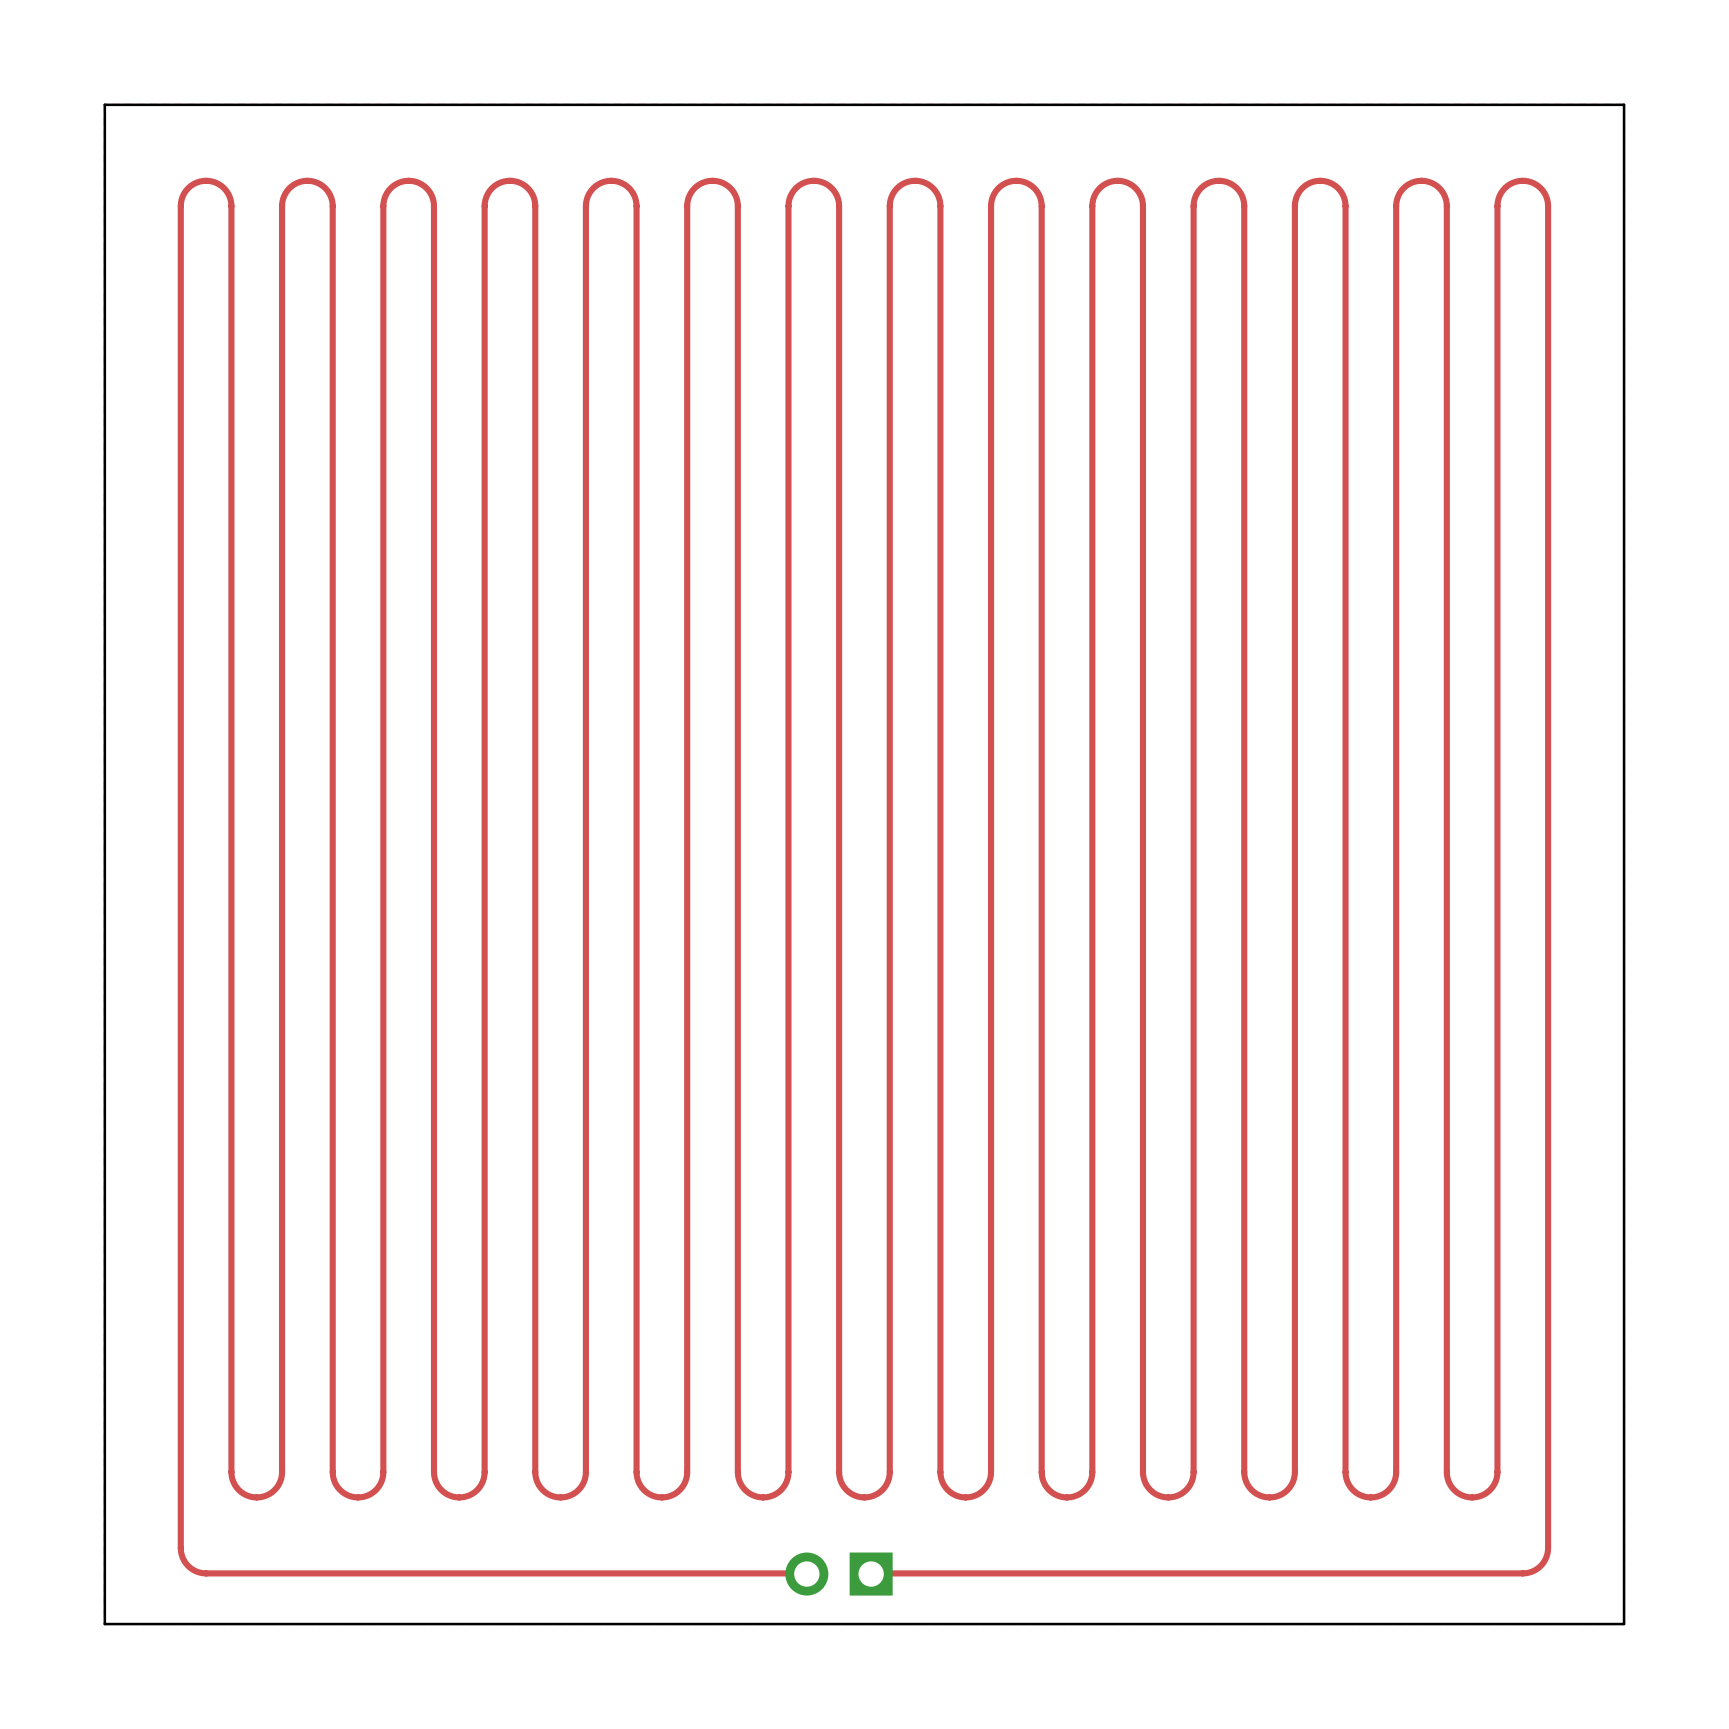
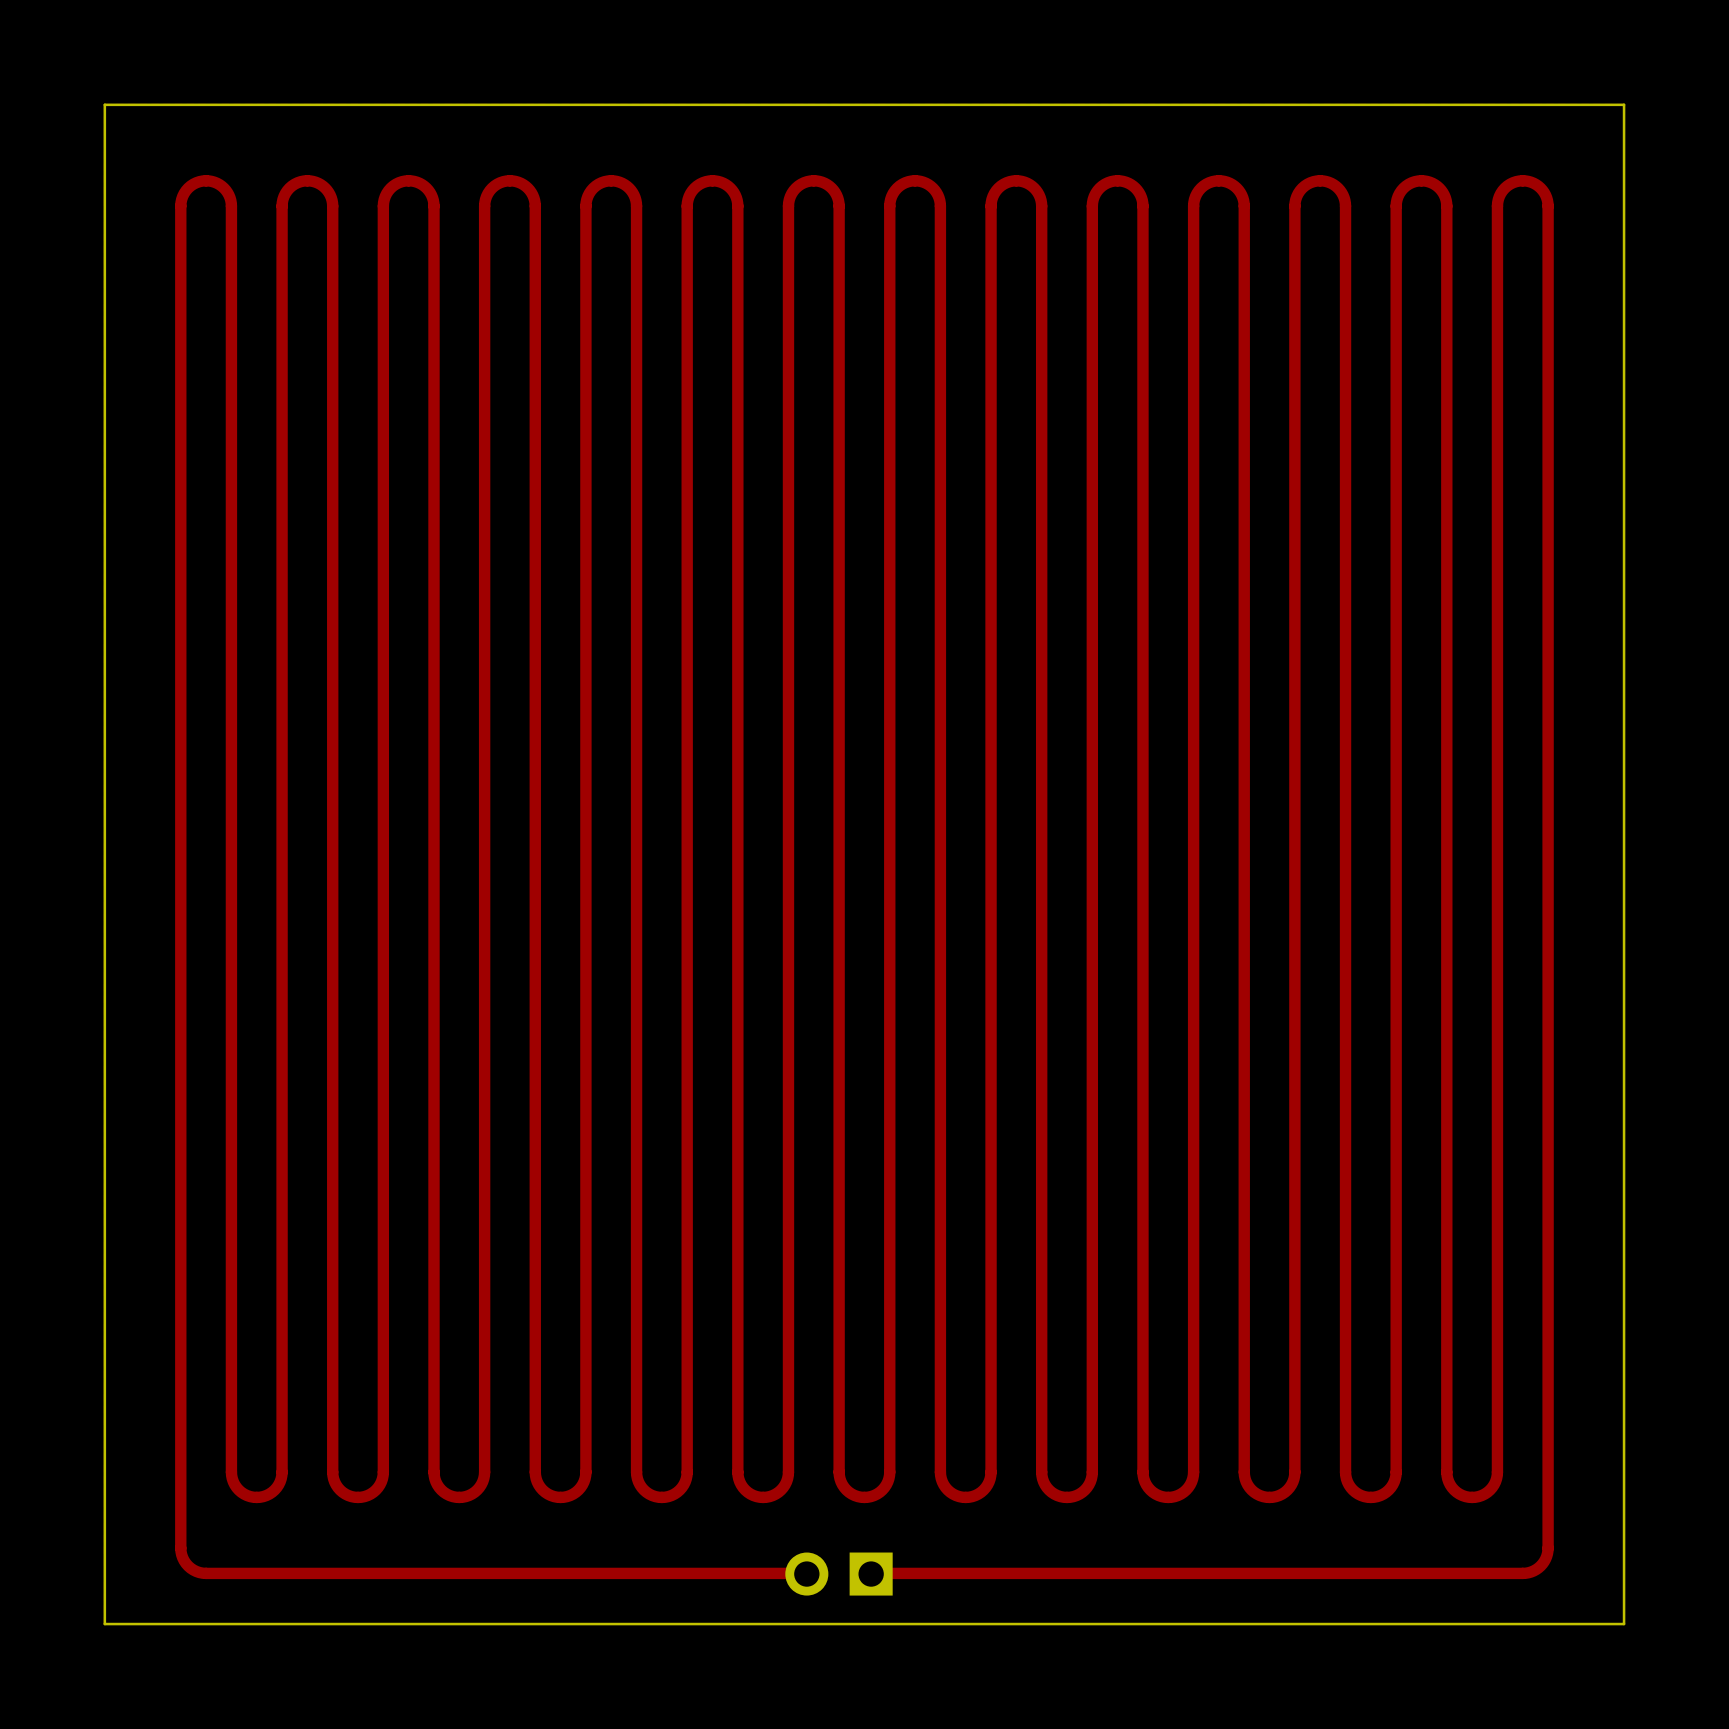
top track width: thin (806, 1573) (206, 1573) (193, 1570) (182, 1557) (180, 1548) (180, 206) (184, 193) (196, 182) (211, 181) (225, 190) (231, 206) (231, 1472) (233, 1481) (238, 1490) (247, 1495) (256, 1497) (266, 1495) (274, 1490) (280, 1481) (282, 1472) (282, 206) (283, 196) (294, 184) (310, 180) (325, 188) (332, 203) (332, 1472) (334, 1481) (340, 1490) (348, 1495) (358, 1497) (367, 1495) (375, 1490) (381, 1481) (383, 1472) (384, 199) (393, 186) (402, 181) (411, 180) (426, 188) (433, 203) (433, 1472) (435, 1481) (441, 1490) (449, 1495) (459, 1497) (469, 1495) (477, 1490) (482, 1481) (484, 1472) (484, 202) (488, 193) (494, 186) (509, 180) (525, 186) (531, 192) (535, 203) (535, 1472) (537, 1481) (542, 1490) (550, 1495) (560, 1497) (570, 1495) (578, 1490) (583, 1481) (585, 1472) (585, 206) (587, 196) (593, 188) (607, 181) (624, 184) (632, 192) (635, 200) (636, 1472) (638, 1481) (643, 1490) (652, 1495) (661, 1497) (671, 1495) (679, 1490) (685, 1481) (687, 1472) (687, 206) (692, 190) (699, 184) (709, 181) (725, 184) (736, 197) (737, 1472) (739, 1481) (745, 1490) (753, 1495) (763, 1497) (772, 1495) (781, 1490) (786, 1481) (788, 1472) (788, 206) (793, 190) (807, 181) (816, 180) (824, 183) (836, 195) (839, 206) (839, 1472) (841, 1481) (846, 1490) (854, 1495) (864, 1497) (874, 1495) (882, 1490) (887, 1481) (889, 1472) (889, 206) (894, 190) (908, 181) (923, 182) (936, 192) (940, 206) (940, 1472) (942, 1481) (947, 1490) (956, 1495) (965, 1497) (975, 1495) (983, 1490) (989, 1481) (991, 1472) (991, 206) (996, 190) (1009, 181) (1024, 182) (1037, 192) (1041, 206) (1041, 1472) (1043, 1481) (1049, 1490) (1057, 1495) (1067, 1497) (1076, 1495) (1084, 1490) (1090, 1481) (1092, 1472) (1092, 206) (1097, 190) (1107, 182) (1123, 181) (1137, 190) (1142, 206) (1142, 1472) (1144, 1481) (1150, 1490) (1158, 1495) (1168, 1497) (1177, 1495) (1186, 1490) (1191, 1481) (1193, 1472) (1193, 206) (1198, 190) (1209, 182) (1224, 181) (1238, 190) (1244, 206) (1244, 1472) (1246, 1481) (1251, 1490) (1259, 1495) (1269, 1497) (1279, 1495) (1287, 1490) (1292, 1481) (1294, 1472) (1294, 206) (1300, 190) (1310, 182) (1325, 181) (1338, 188) (1344, 197) (1345, 206) (1345, 1472) (1347, 1481) (1352, 1490) (1361, 1495) (1370, 1497) (1380, 1495) (1388, 1490) (1394, 1481) (1396, 1472) (1396, 206) (1399, 193) (1411, 182) (1427, 181) (1439, 188) (1445, 197) (1446, 206) (1446, 1472) (1448, 1481) (1454, 1490) (1462, 1495) (1472, 1497) (1481, 1495) (1490, 1490) (1495, 1481) (1497, 1472) (1497, 206) (1500, 193) (1510, 184) (1522, 180) (1533, 183) (1544, 192) (1548, 206) (1548, 1548) (1545, 1559) (1536, 1569) (1522, 1573) (871, 1574) -> thick (806, 1573) (206, 1573) (193, 1570) (182, 1557) (180, 1548) (180, 206) (184, 193) (196, 182) (211, 181) (225, 190) (231, 206) (231, 1472) (233, 1481) (238, 1490) (247, 1495) (256, 1497) (266, 1495) (274, 1490) (280, 1481) (282, 1472) (282, 206) (283, 196) (294, 184) (310, 180) (325, 188) (332, 203) (332, 1472) (334, 1481) (340, 1490) (348, 1495) (358, 1497) (367, 1495) (375, 1490) (381, 1481) (383, 1472) (384, 199) (393, 186) (402, 181) (411, 180) (426, 188) (433, 203) (433, 1472) (435, 1481) (441, 1490) (449, 1495) (459, 1497) (469, 1495) (477, 1490) (482, 1481) (484, 1472) (484, 202) (488, 193) (494, 186) (509, 180) (525, 186) (531, 192) (535, 203) (535, 1472) (537, 1481) (542, 1490) (550, 1495) (560, 1497) (570, 1495) (578, 1490) (583, 1481) (585, 1472) (585, 206) (587, 196) (593, 188) (607, 181) (624, 184) (632, 192) (635, 200) (636, 1472) (638, 1481) (643, 1490) (652, 1495) (661, 1497) (671, 1495) (679, 1490) (685, 1481) (687, 1472) (687, 206) (692, 190) (699, 184) (709, 181) (725, 184) (736, 197) (737, 1472) (739, 1481) (745, 1490) (753, 1495) (763, 1497) (772, 1495) (781, 1490) (786, 1481) (788, 1472) (788, 206) (793, 190) (807, 181) (816, 180) (824, 183) (836, 195) (839, 206) (839, 1472) (841, 1481) (846, 1490) (854, 1495) (864, 1497) (874, 1495) (882, 1490) (887, 1481) (889, 1472) (889, 206) (894, 190) (908, 181) (923, 182) (936, 192) (940, 206) (940, 1472) (942, 1481) (947, 1490) (956, 1495) (965, 1497) (975, 1495) (983, 1490) (989, 1481) (991, 1472) (991, 206) (996, 190) (1009, 181) (1024, 182) (1037, 192) (1041, 206) (1041, 1472) (1043, 1481) (1049, 1490) (1057, 1495) (1067, 1497) (1076, 1495) (1084, 1490) (1090, 1481) (1092, 1472) (1092, 206) (1097, 190) (1107, 182) (1123, 181) (1137, 190) (1142, 206) (1142, 1472) (1144, 1481) (1150, 1490) (1158, 1495) (1168, 1497) (1177, 1495) (1186, 1490) (1191, 1481) (1193, 1472) (1193, 206) (1198, 190) (1209, 182) (1224, 181) (1238, 190) (1244, 206) (1244, 1472) (1246, 1481) (1251, 1490) (1259, 1495) (1269, 1497) (1279, 1495) (1287, 1490) (1292, 1481) (1294, 1472) (1294, 206) (1300, 190) (1310, 182) (1325, 181) (1338, 188) (1344, 197) (1345, 206) (1345, 1472) (1347, 1481) (1352, 1490) (1361, 1495) (1370, 1497) (1380, 1495) (1388, 1490) (1394, 1481) (1396, 1472) (1396, 206) (1399, 193) (1411, 182) (1427, 181) (1439, 188) (1445, 197) (1446, 206) (1446, 1472) (1448, 1481) (1454, 1490) (1462, 1495) (1472, 1497) (1481, 1495) (1490, 1490) (1495, 1481) (1497, 1472) (1497, 206) (1500, 193) (1510, 184) (1522, 180) (1533, 183) (1544, 192) (1548, 206) (1548, 1548) (1545, 1559) (1536, 1569) (1522, 1573) (871, 1574)

